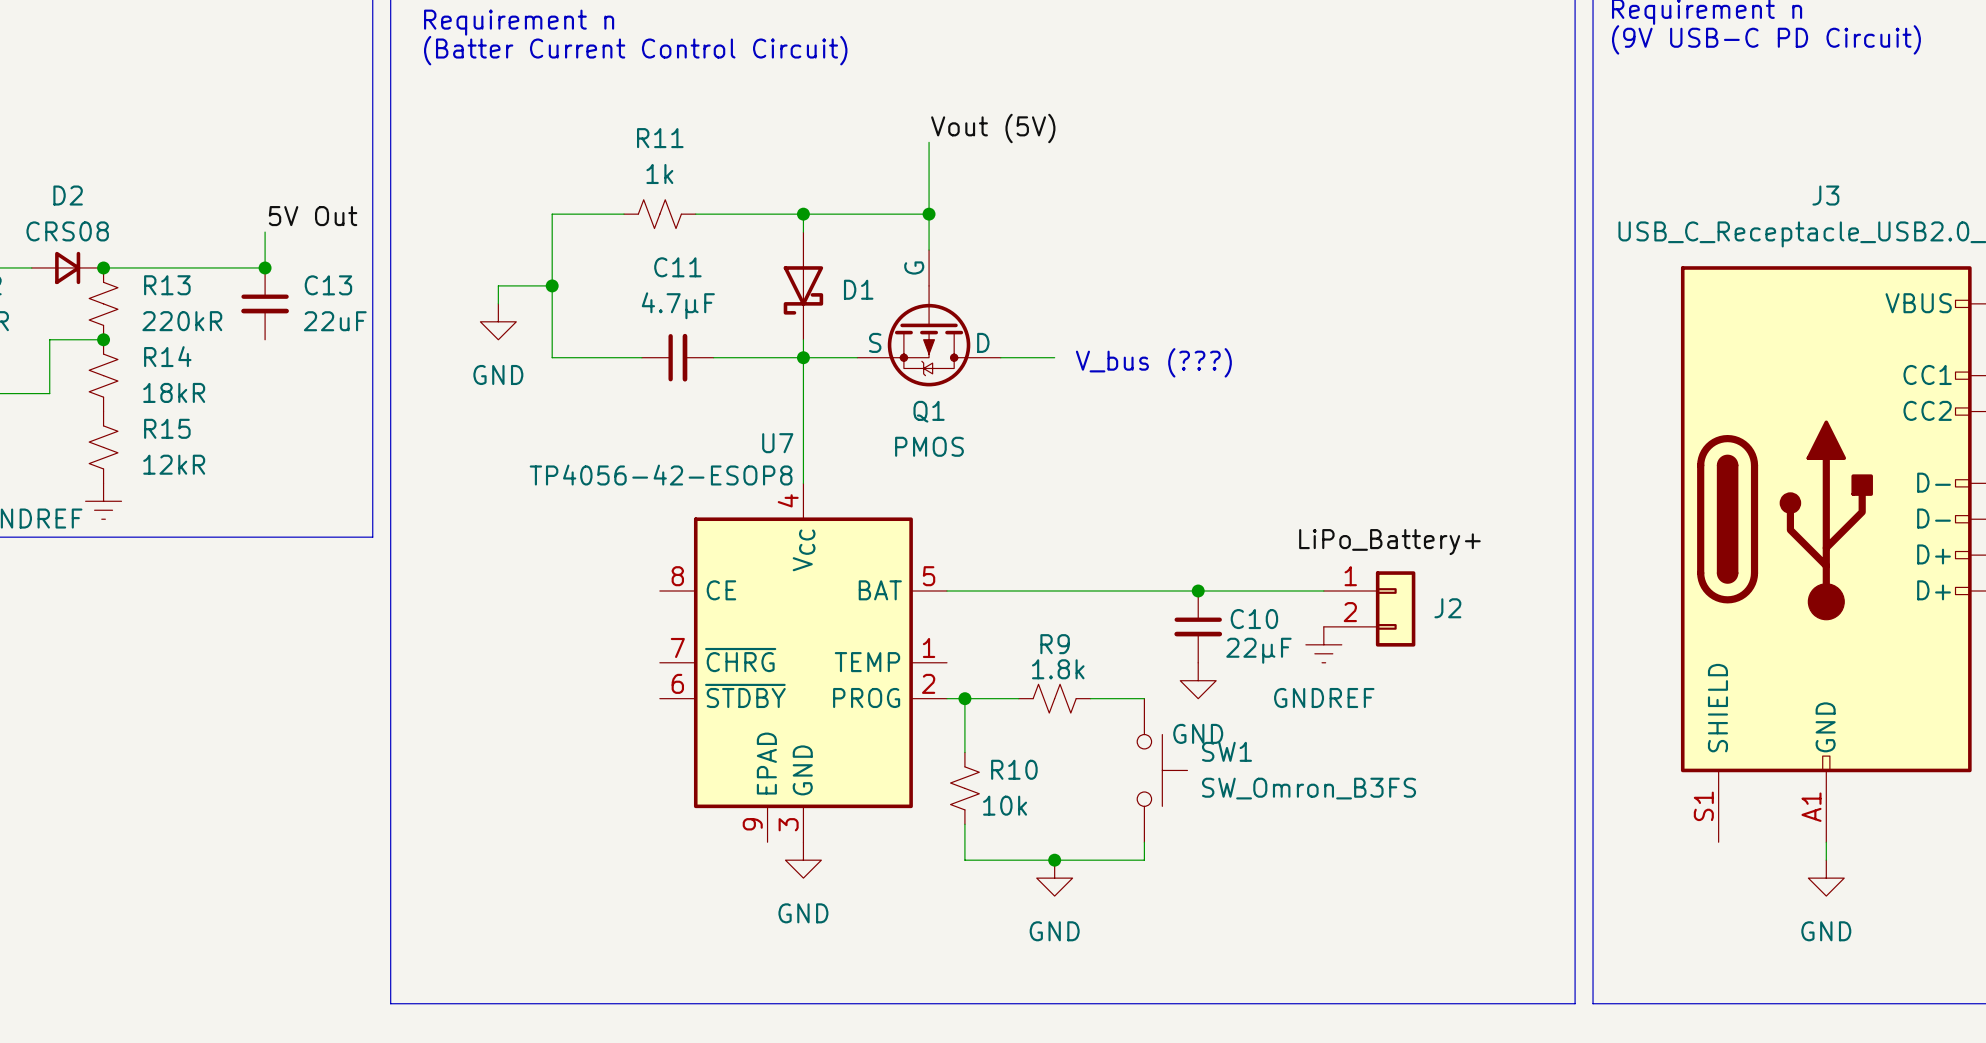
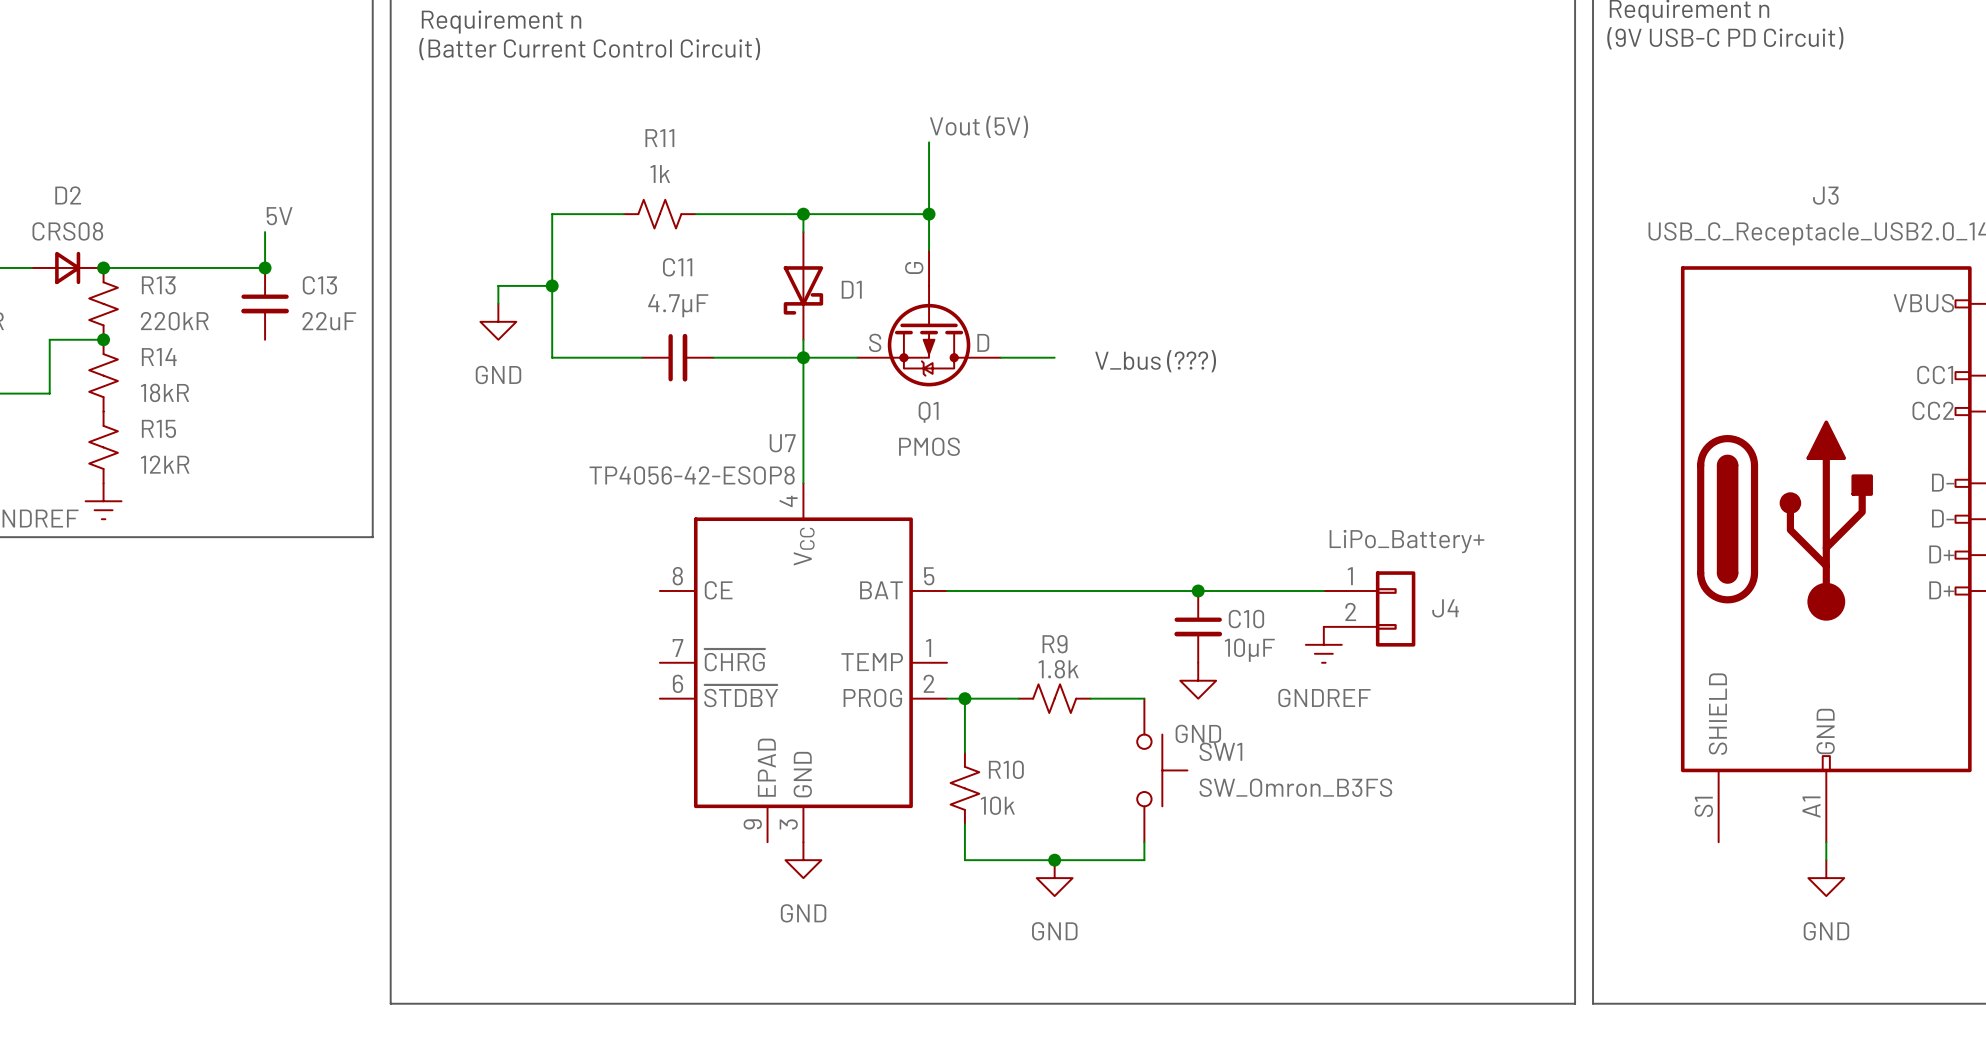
label: 5V Out (313, 216) -> 5V (279, 216)
J2 name: J2 (1447, 608) -> J4 (1445, 608)
C10 value: 22µF (1258, 650) -> 10µF (1249, 650)

